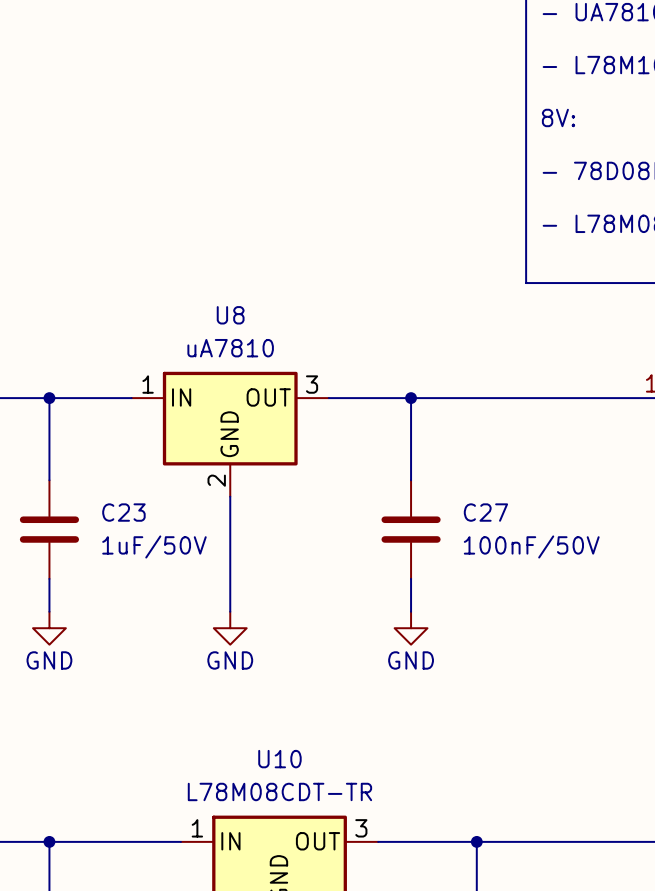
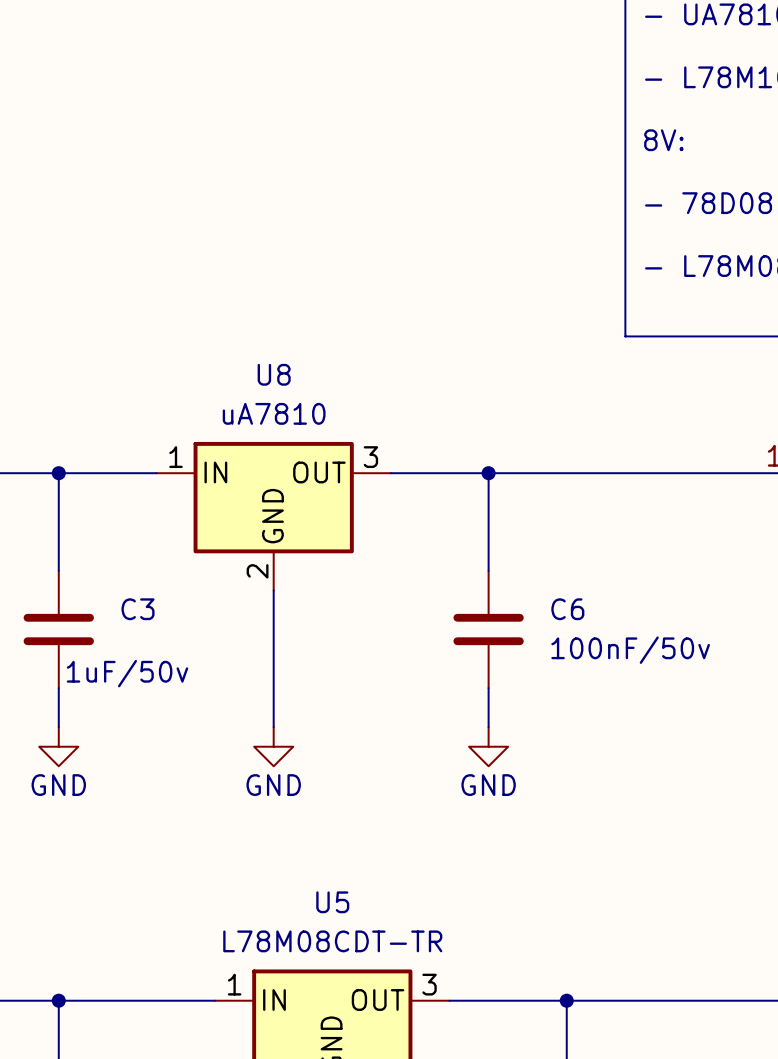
C23 name: C23 (123, 512) -> C3 (138, 609)
C27 name: C27 (485, 512) -> C6 (567, 609)
C23 value: 1uF/50V (154, 546) -> 1uF/50v (127, 673)
C27 value: 100nF/50V (531, 546) -> 100nF/50v (630, 650)
U10 name: U10 (279, 759) -> U5 (332, 902)

